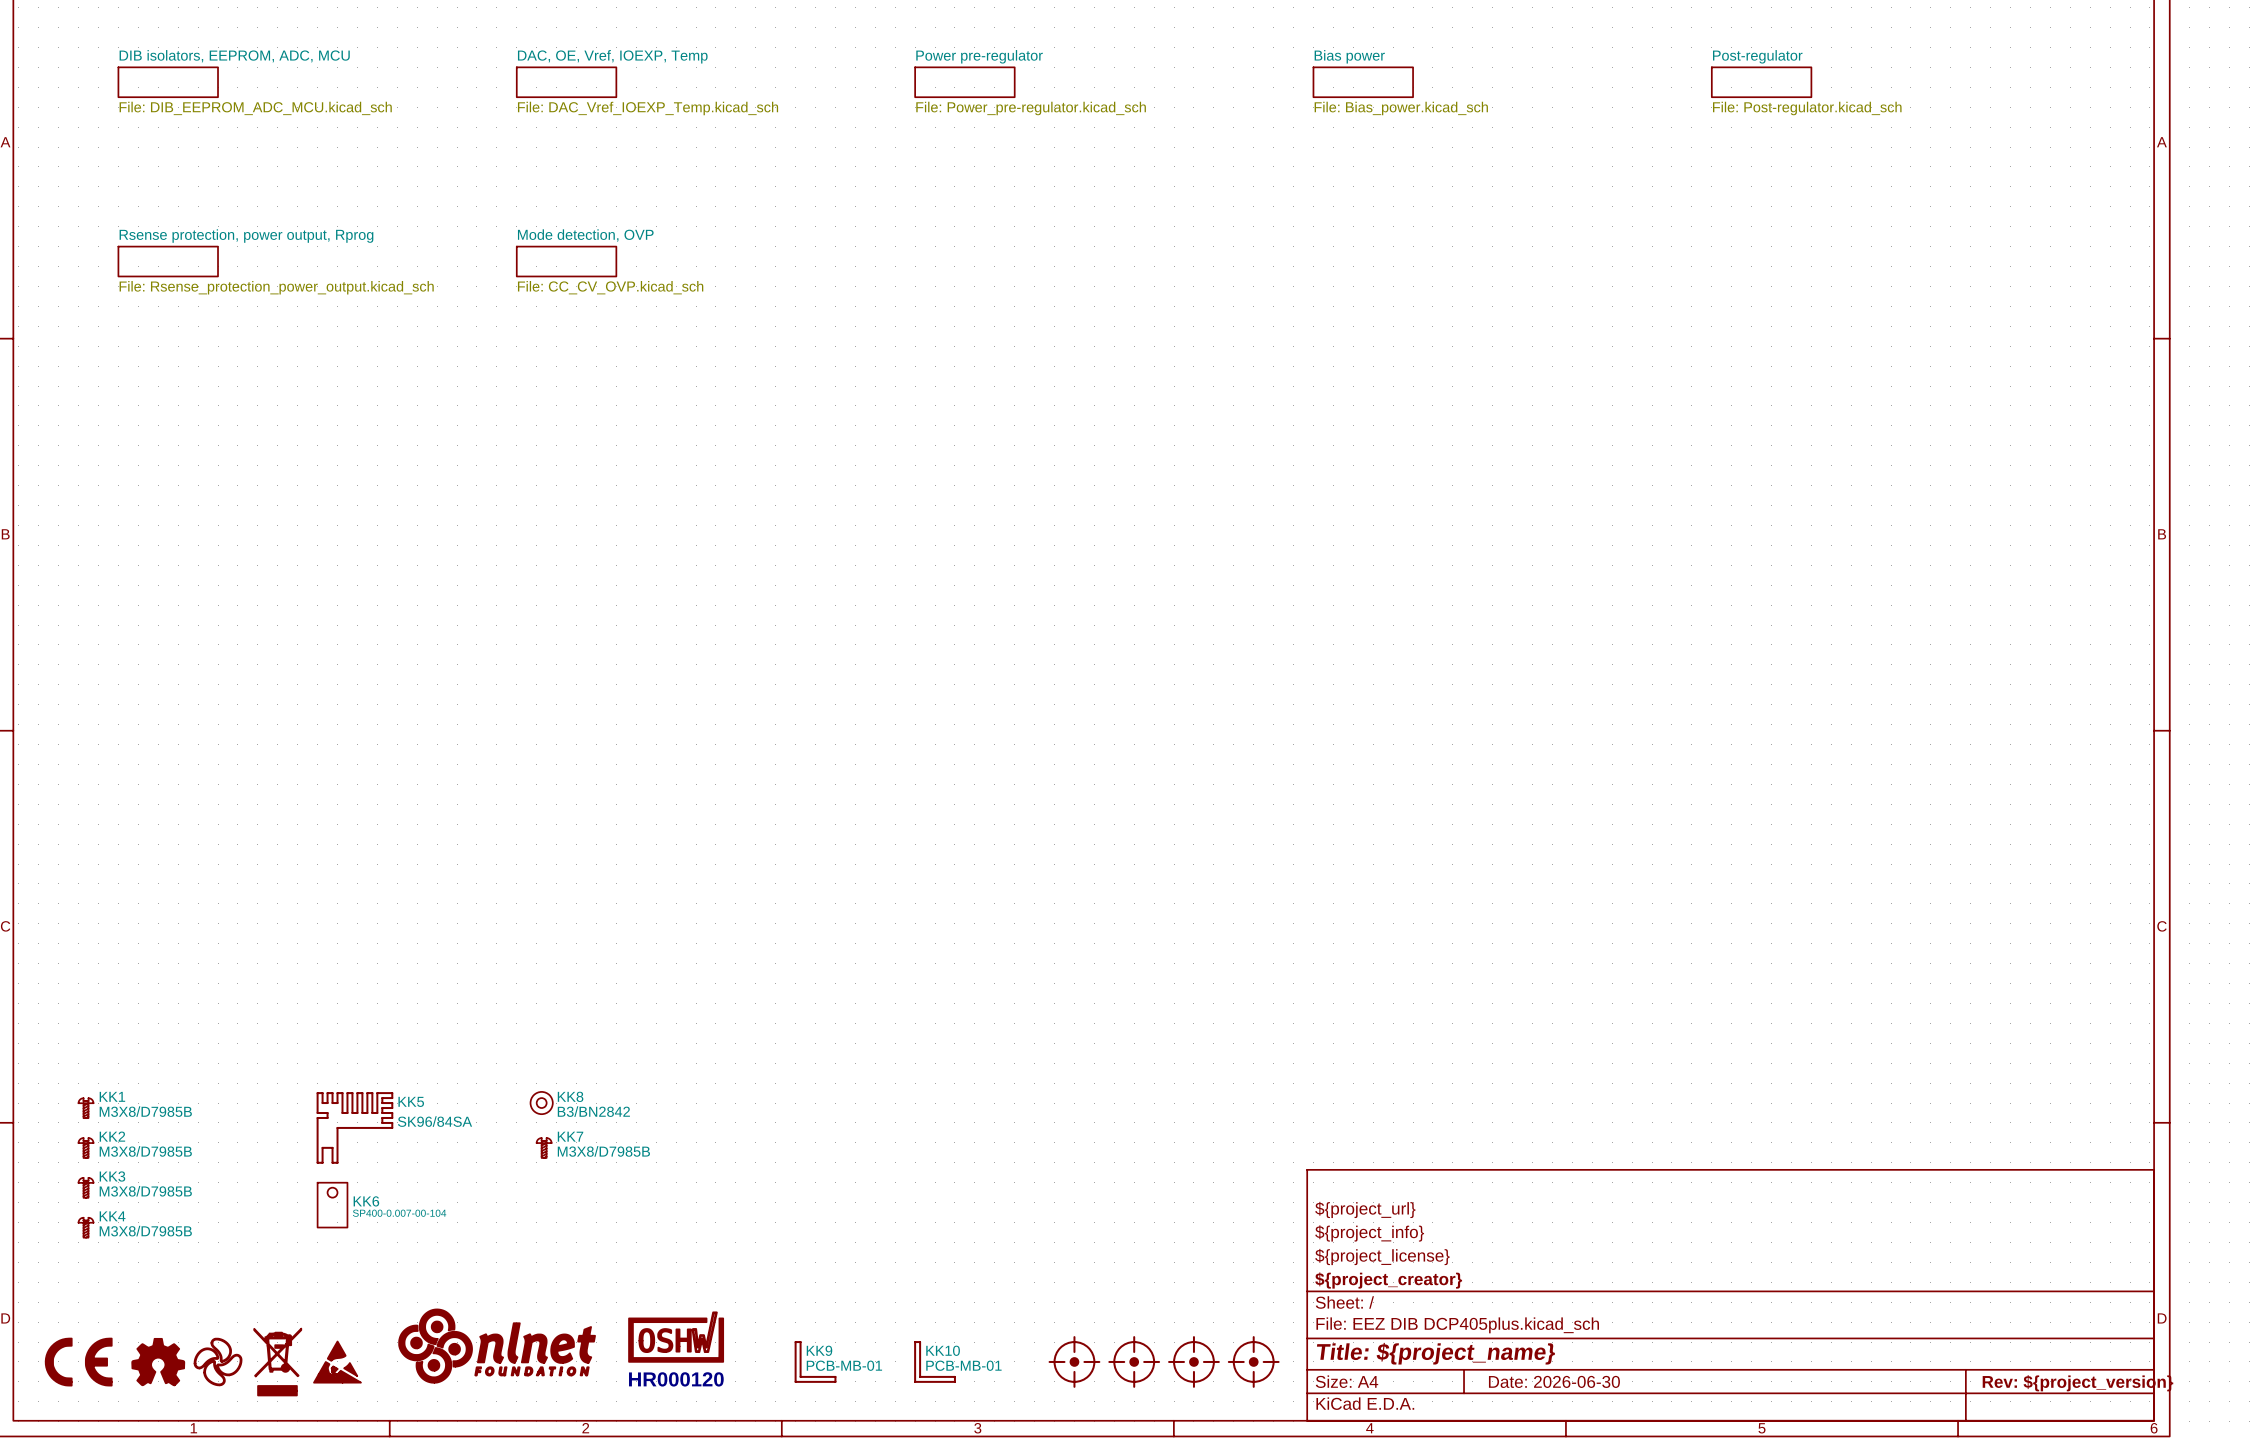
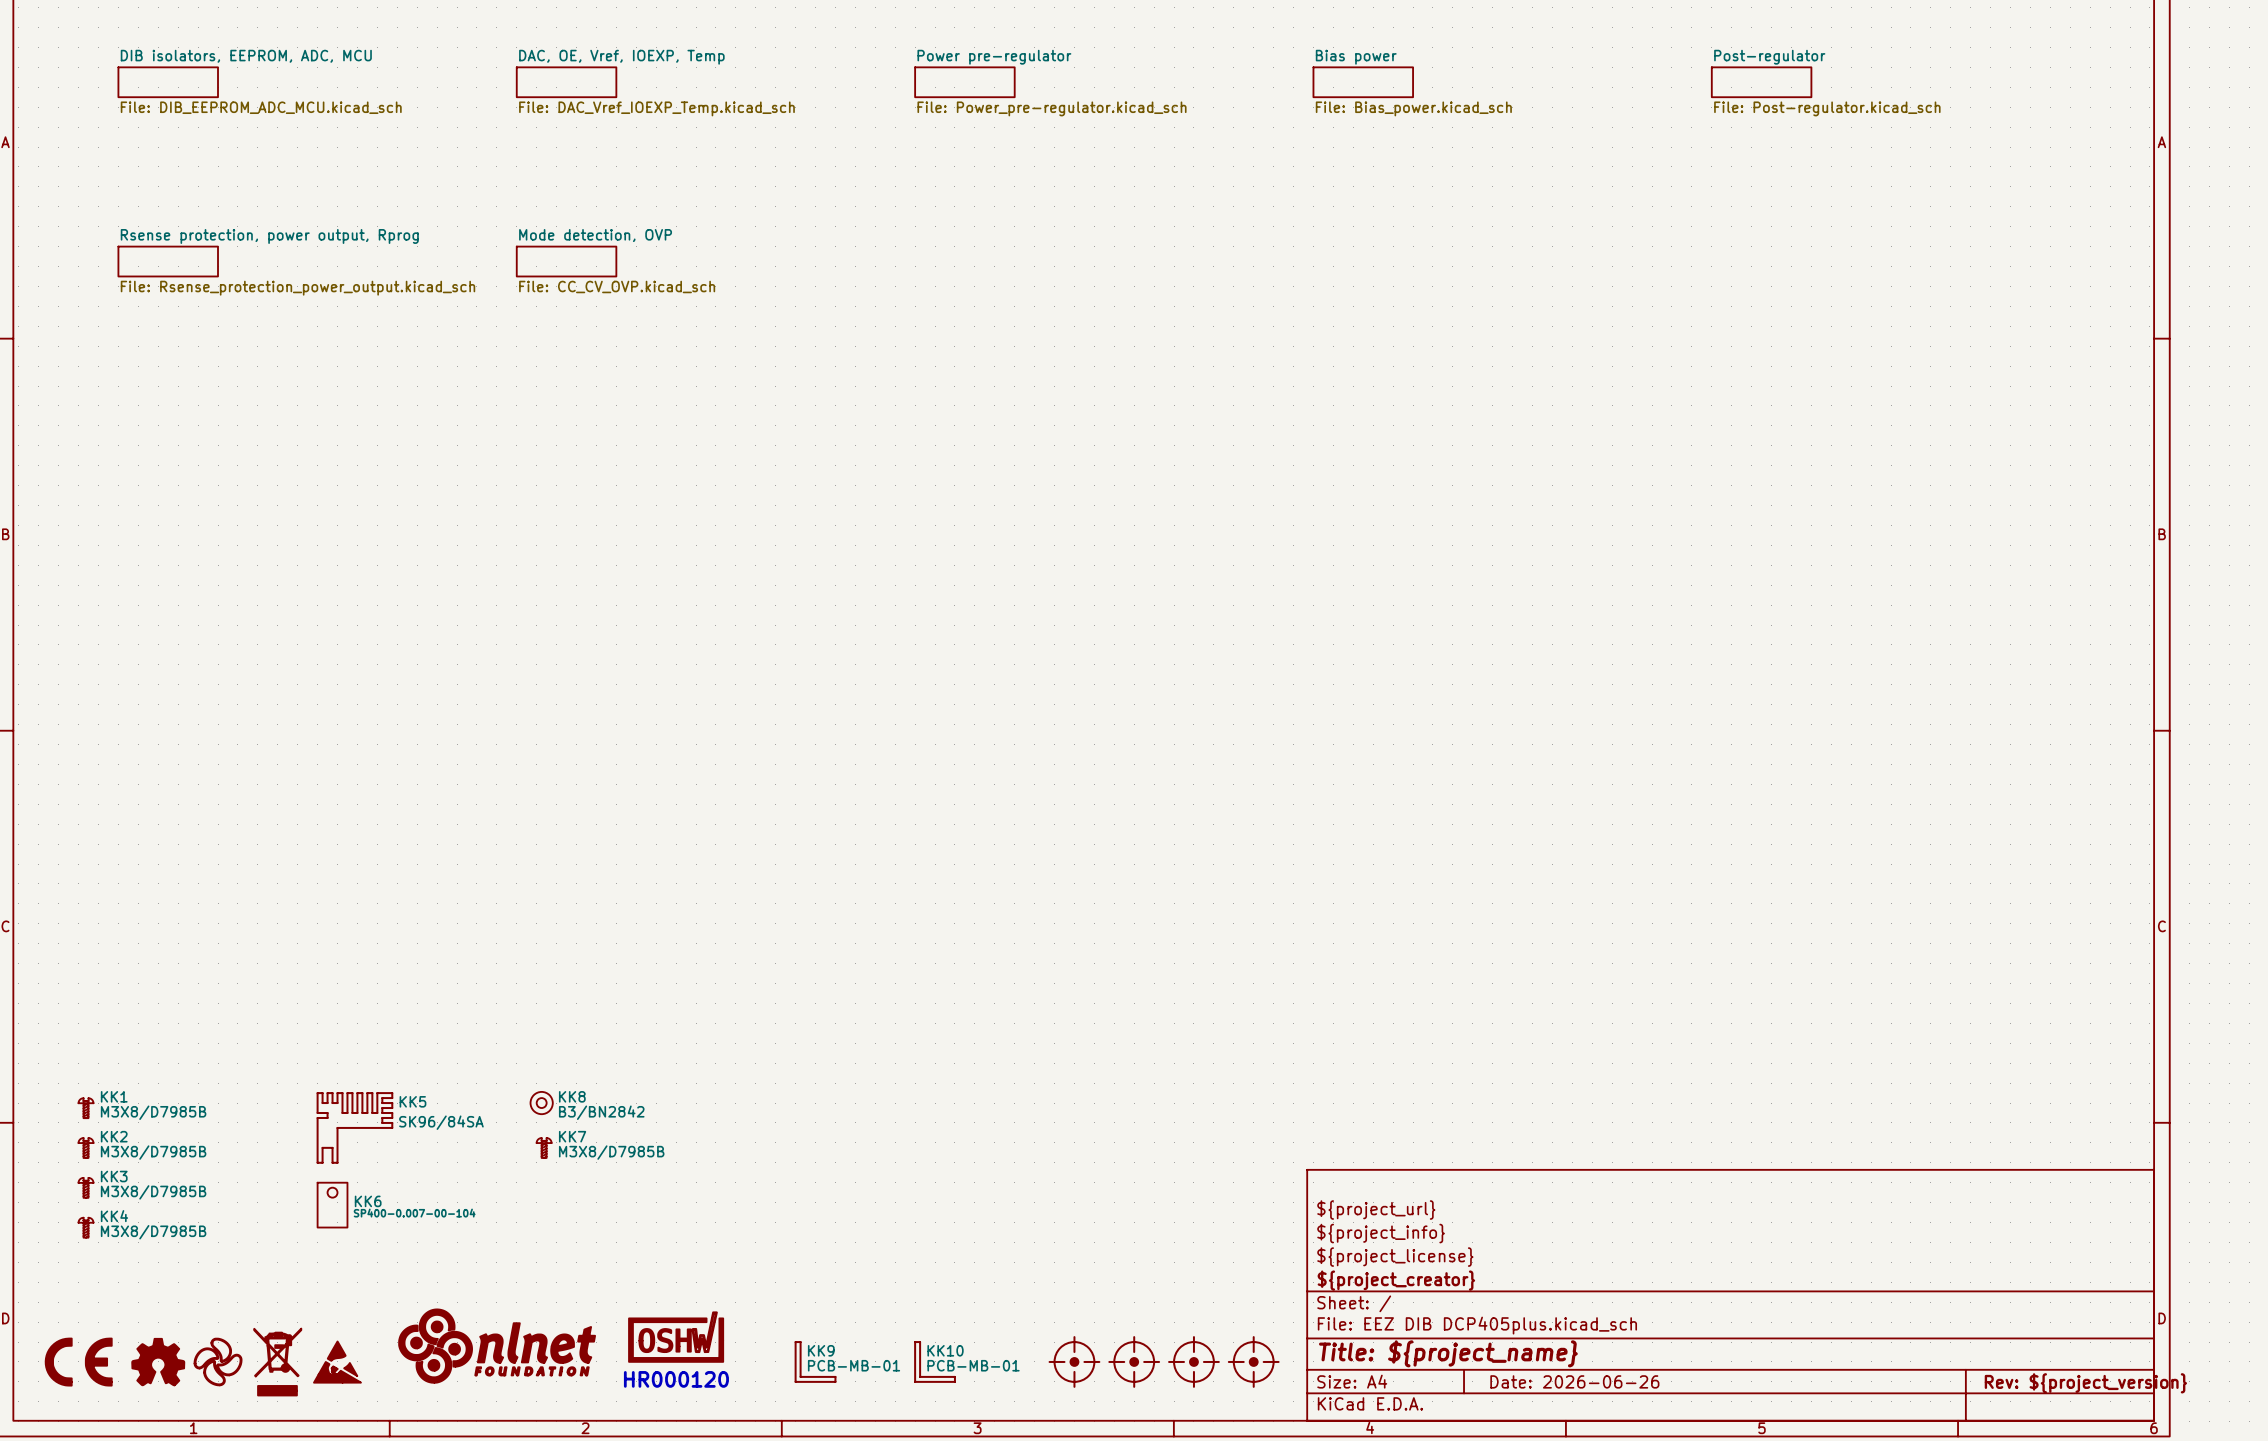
title block: Date: 2026-06-30 (1554, 1381) -> Date: 2026-06-26 (1574, 1381)

